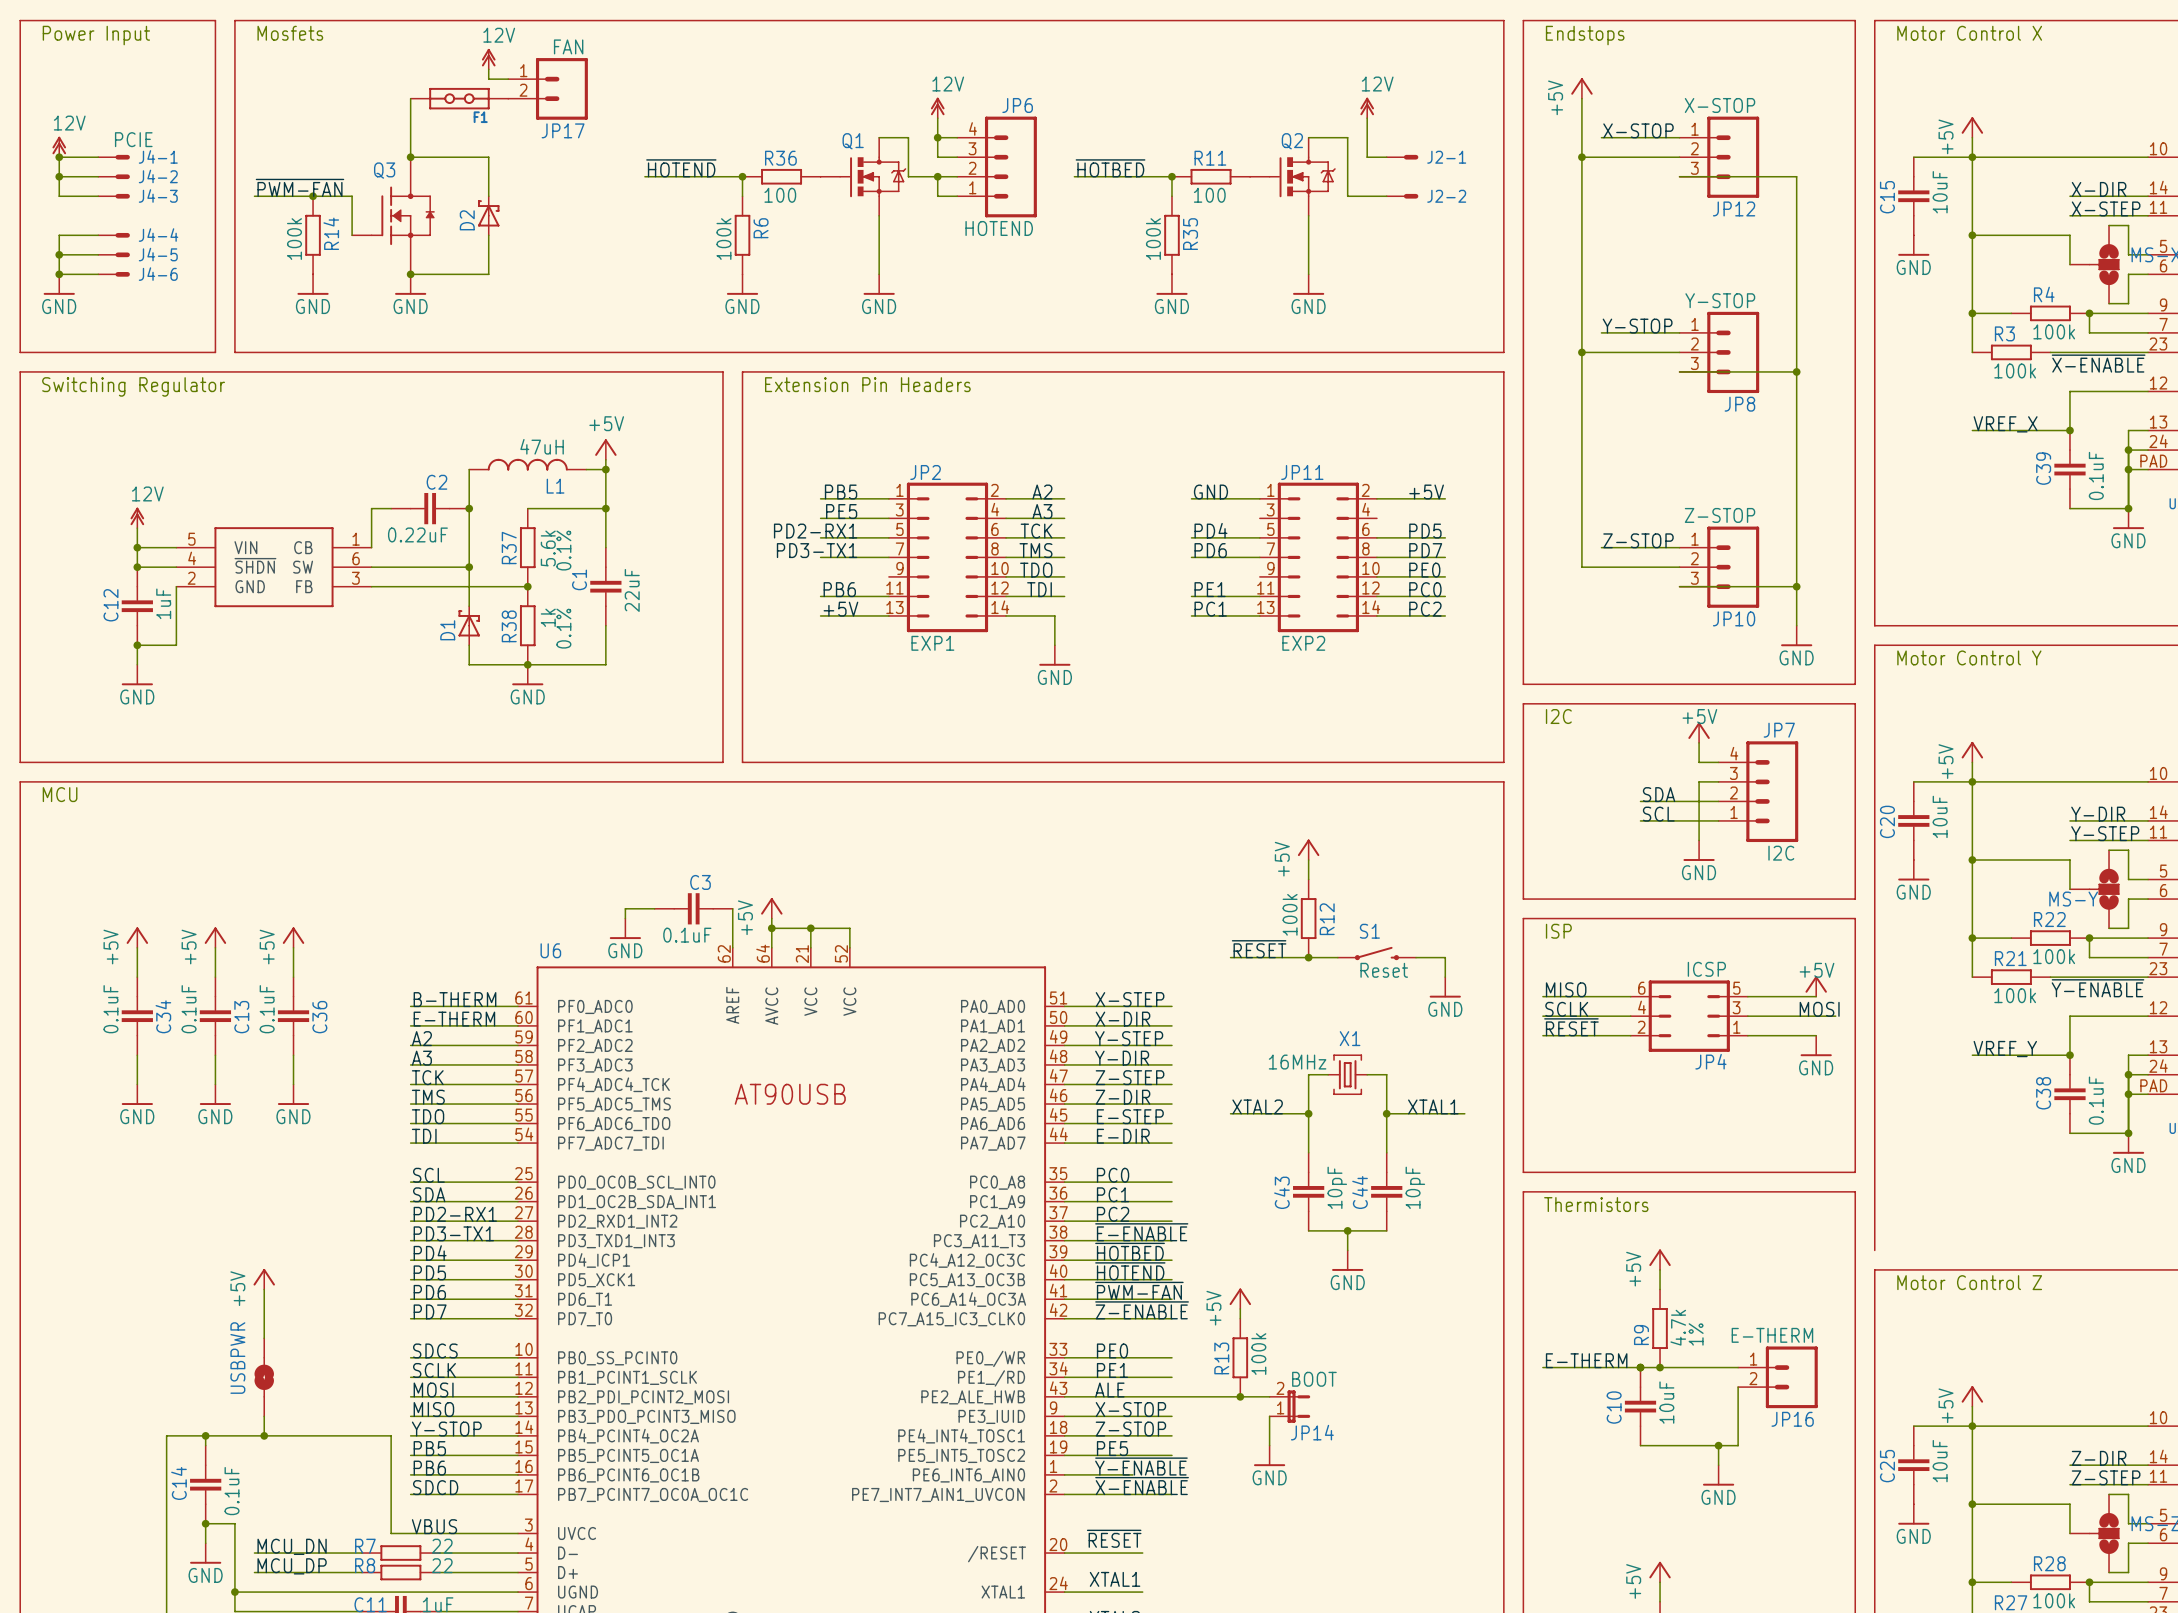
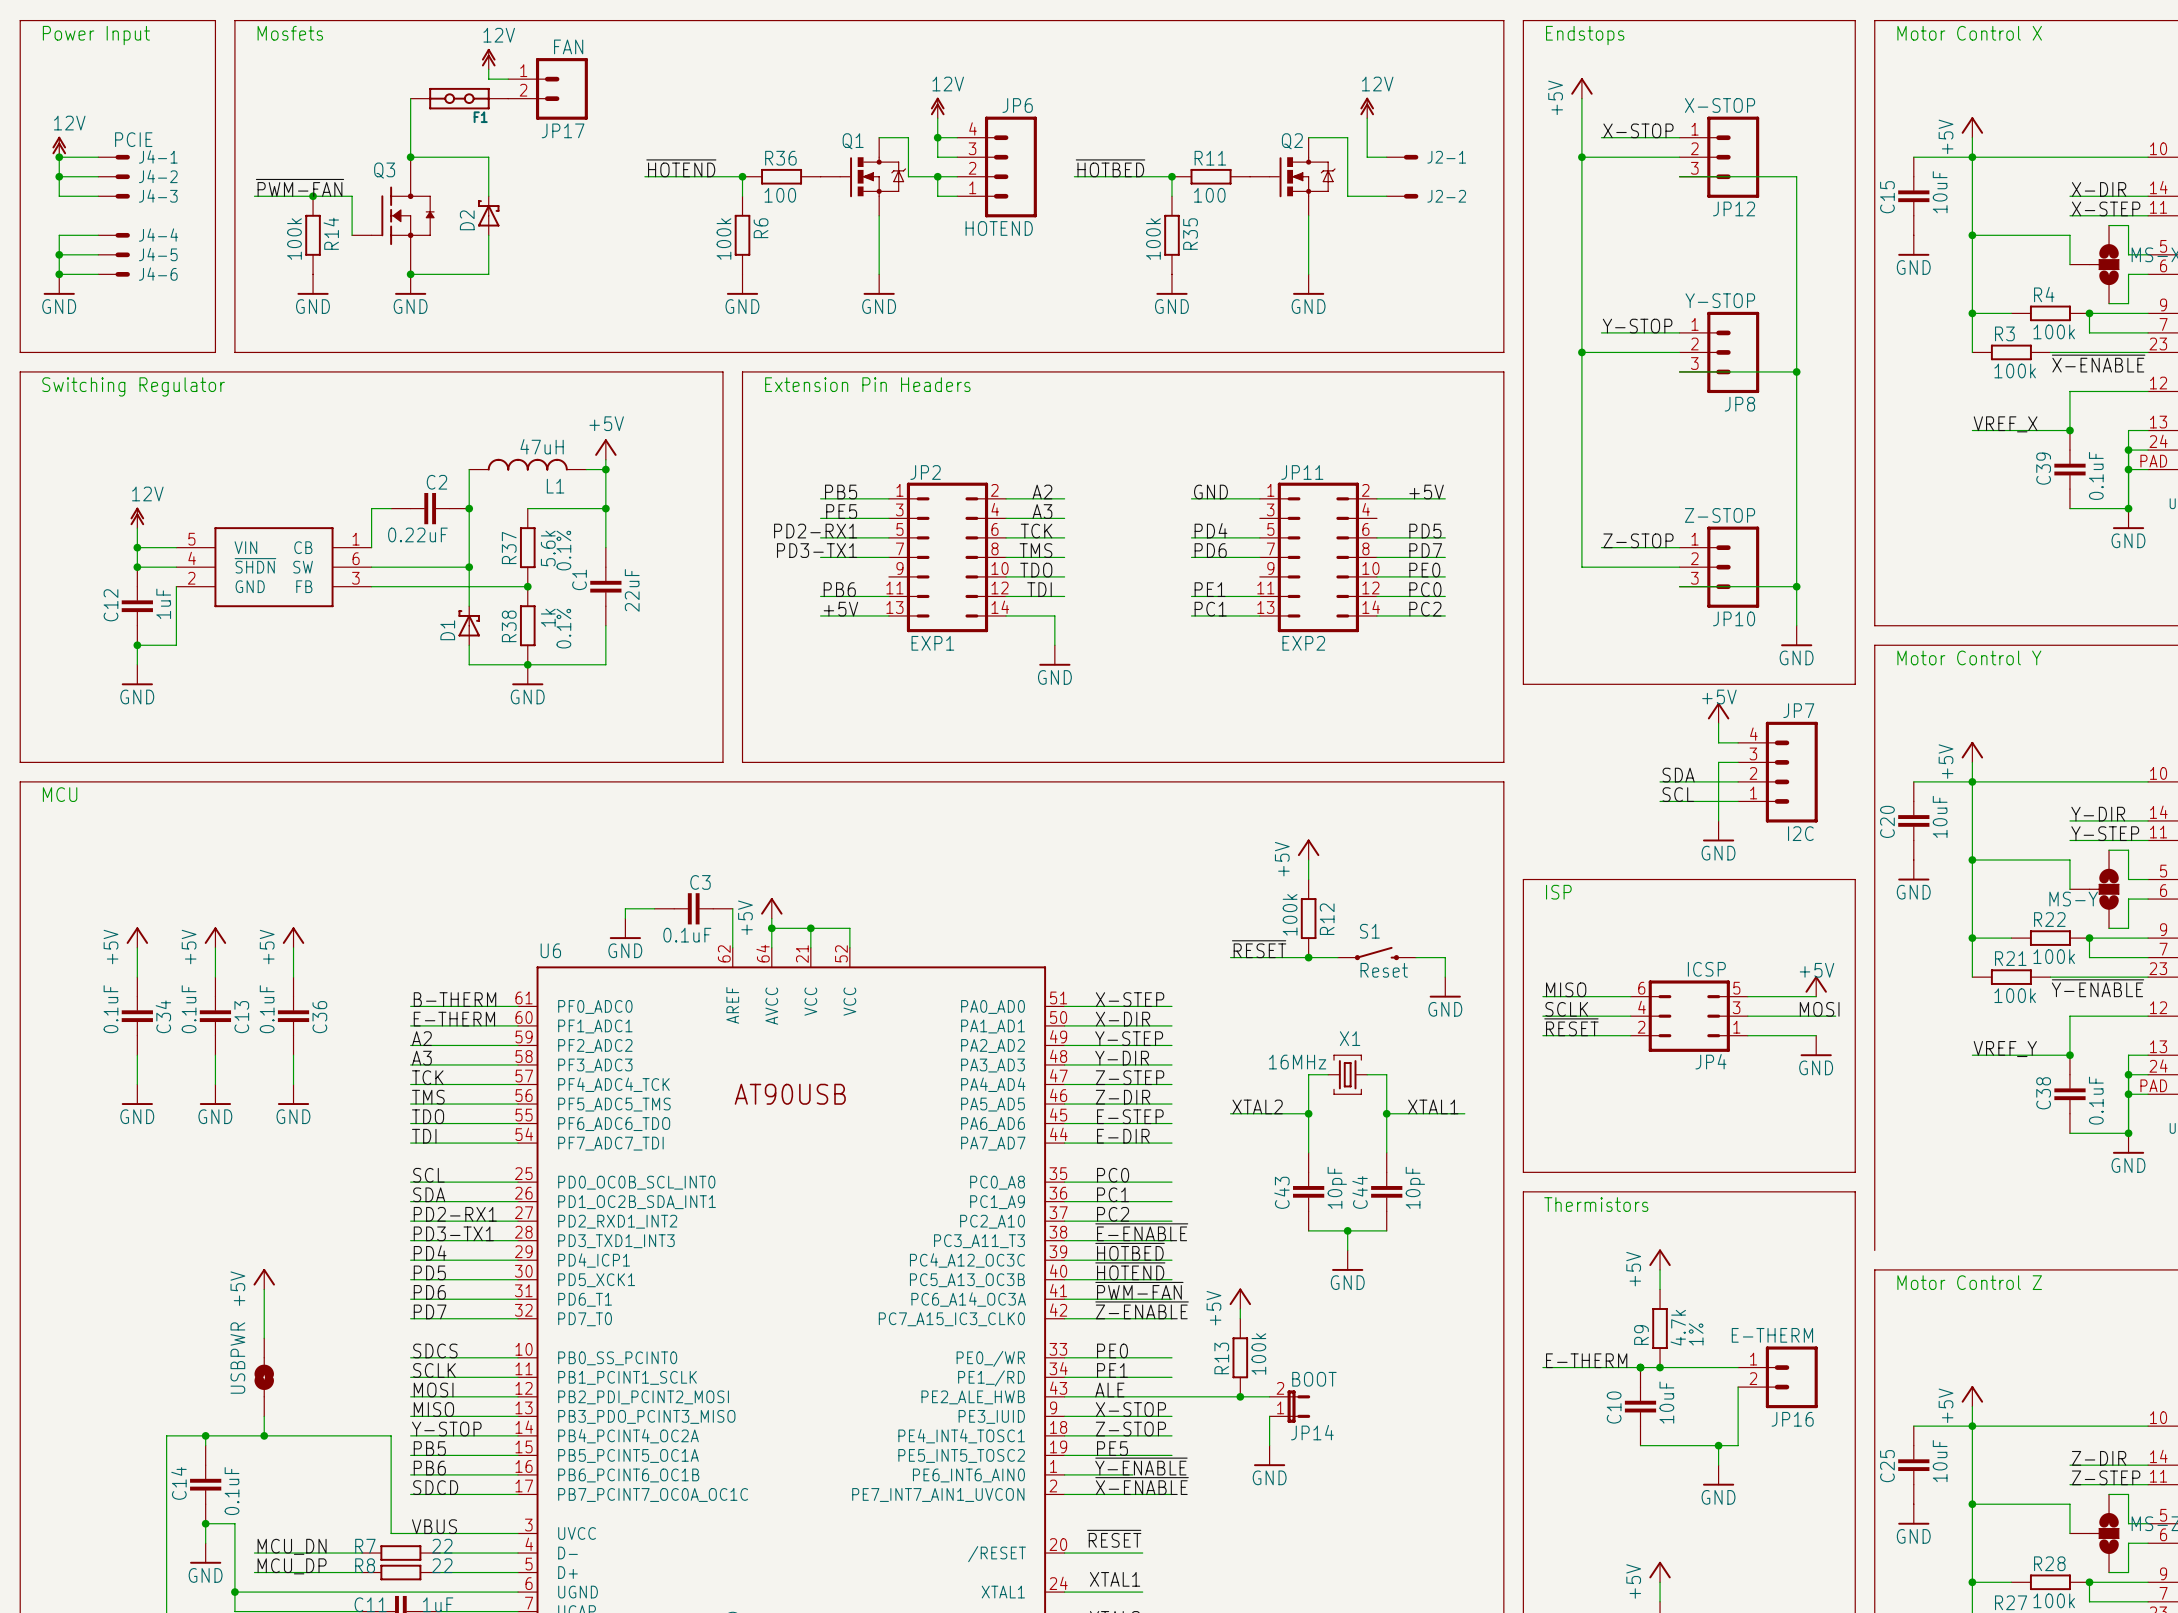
text: I2C (1558, 716) -> none
power symbol position: +5V (1699, 732) -> +5V (1718, 713)
wire: (1699, 742) (1699, 762) (1718, 762) -> (1718, 723) (1718, 742) (1738, 742)
wire: (1699, 781) (1699, 840) -> (1699, 781) (1660, 781)
JP7 position: (1758, 791) -> (1777, 772)
label position: SDA (1659, 794) -> SDA (1678, 775)
label position: SCL (1658, 814) -> SCL (1678, 794)
wire: (1640, 820) (1718, 820) -> (1738, 762) (1718, 762) (1718, 820)
power symbol position: GND (1699, 850) -> GND (1718, 831)
line: (1523, 879) (1523, 703) (1855, 703) (1855, 879) -> (1523, 879) (1855, 879)
line: (1523, 899) (1855, 899) -> (1523, 899) (1523, 918)
line: (1523, 918) (1855, 918) -> (1855, 899) (1855, 918)
text position: ISP (1558, 931) -> ISP (1558, 892)

